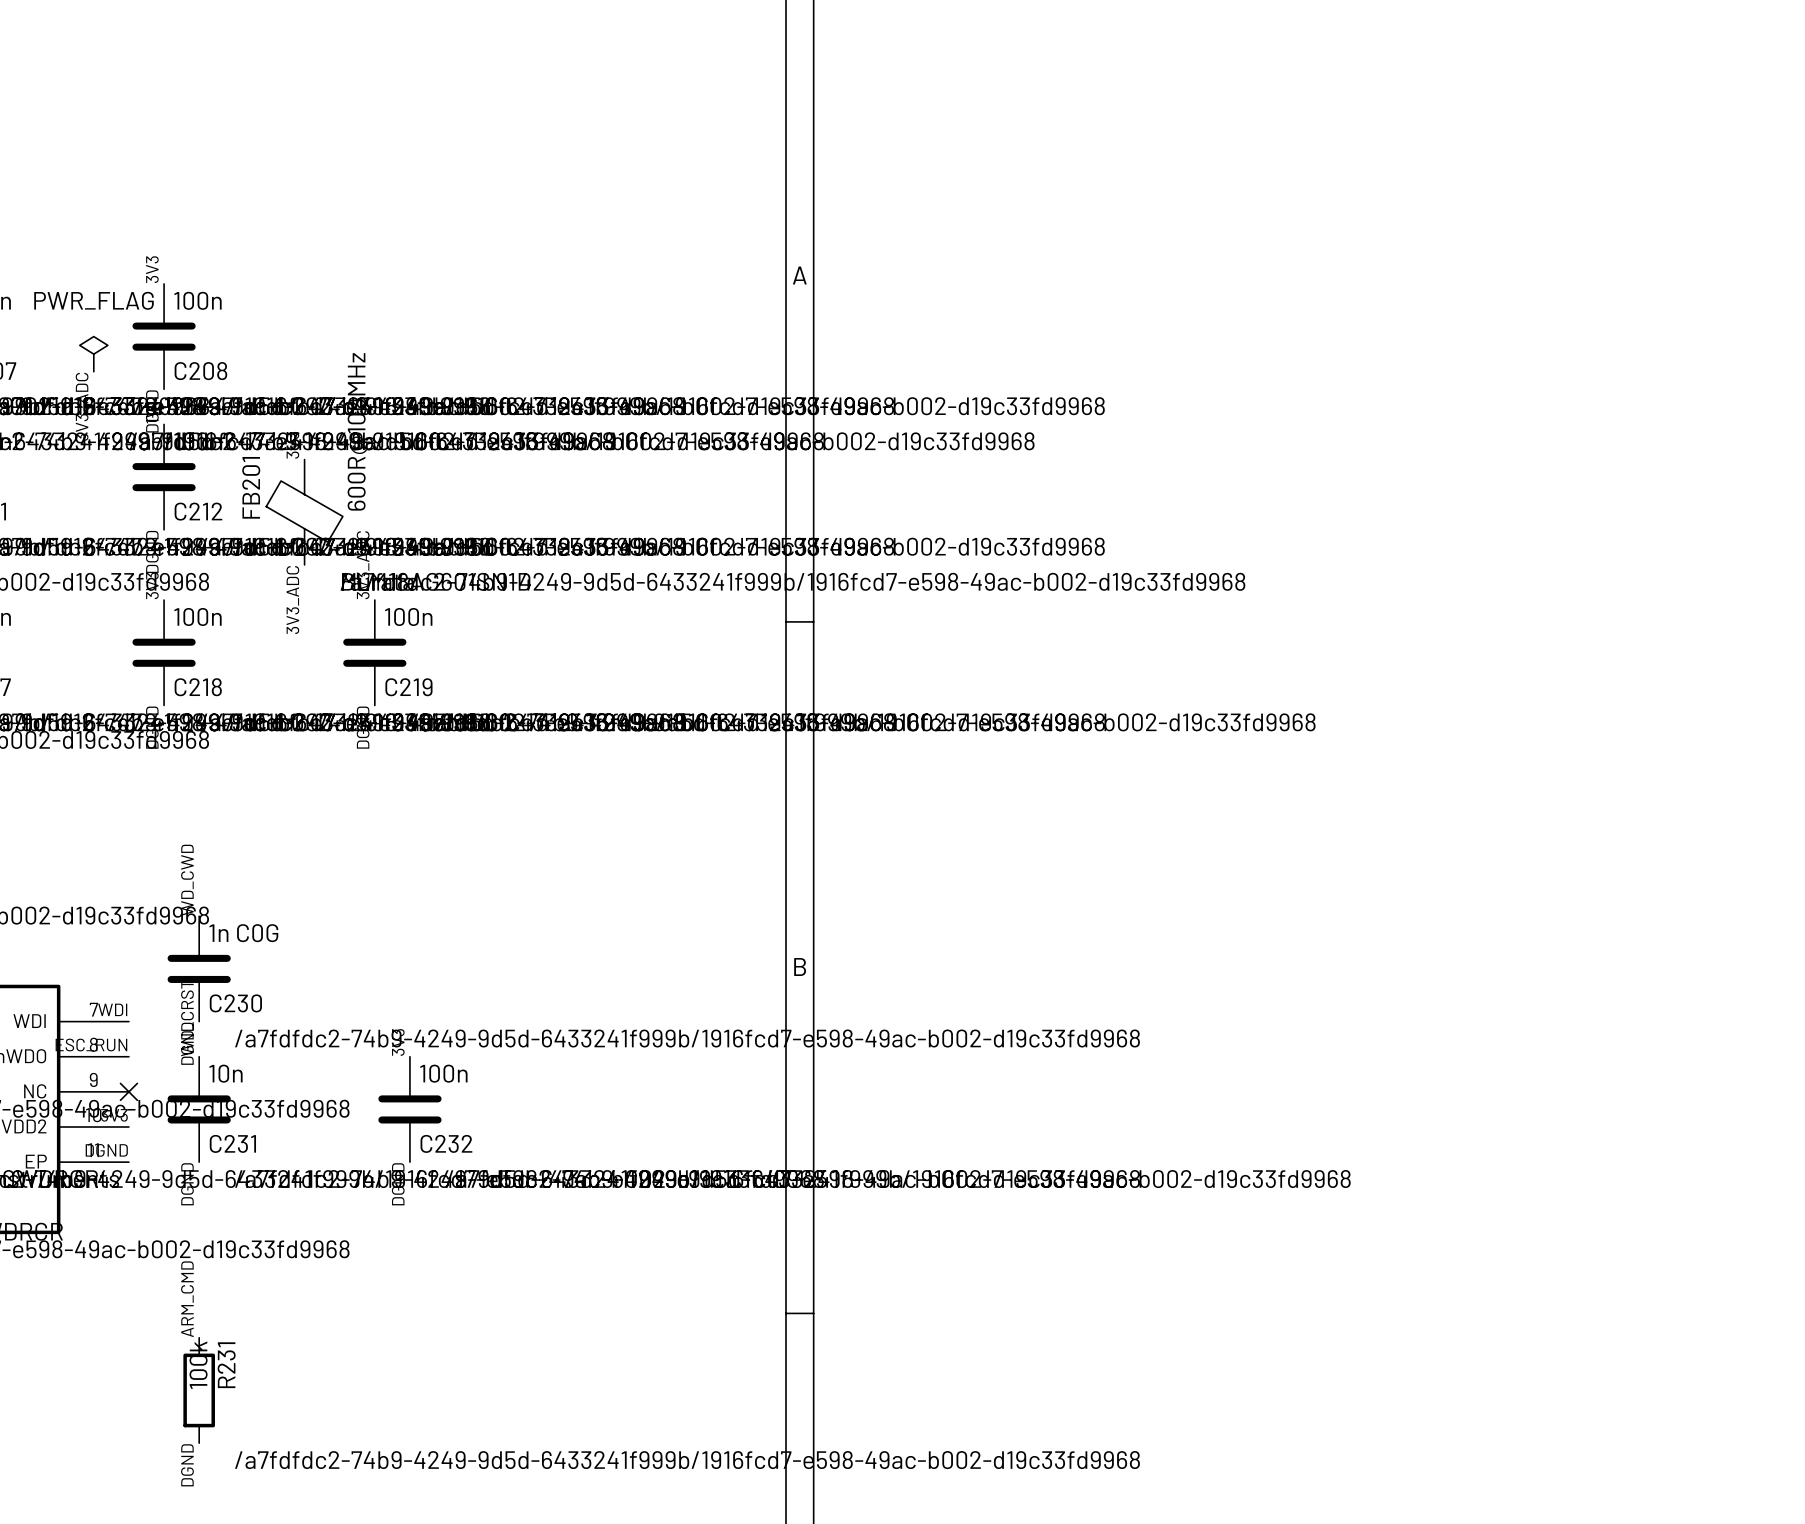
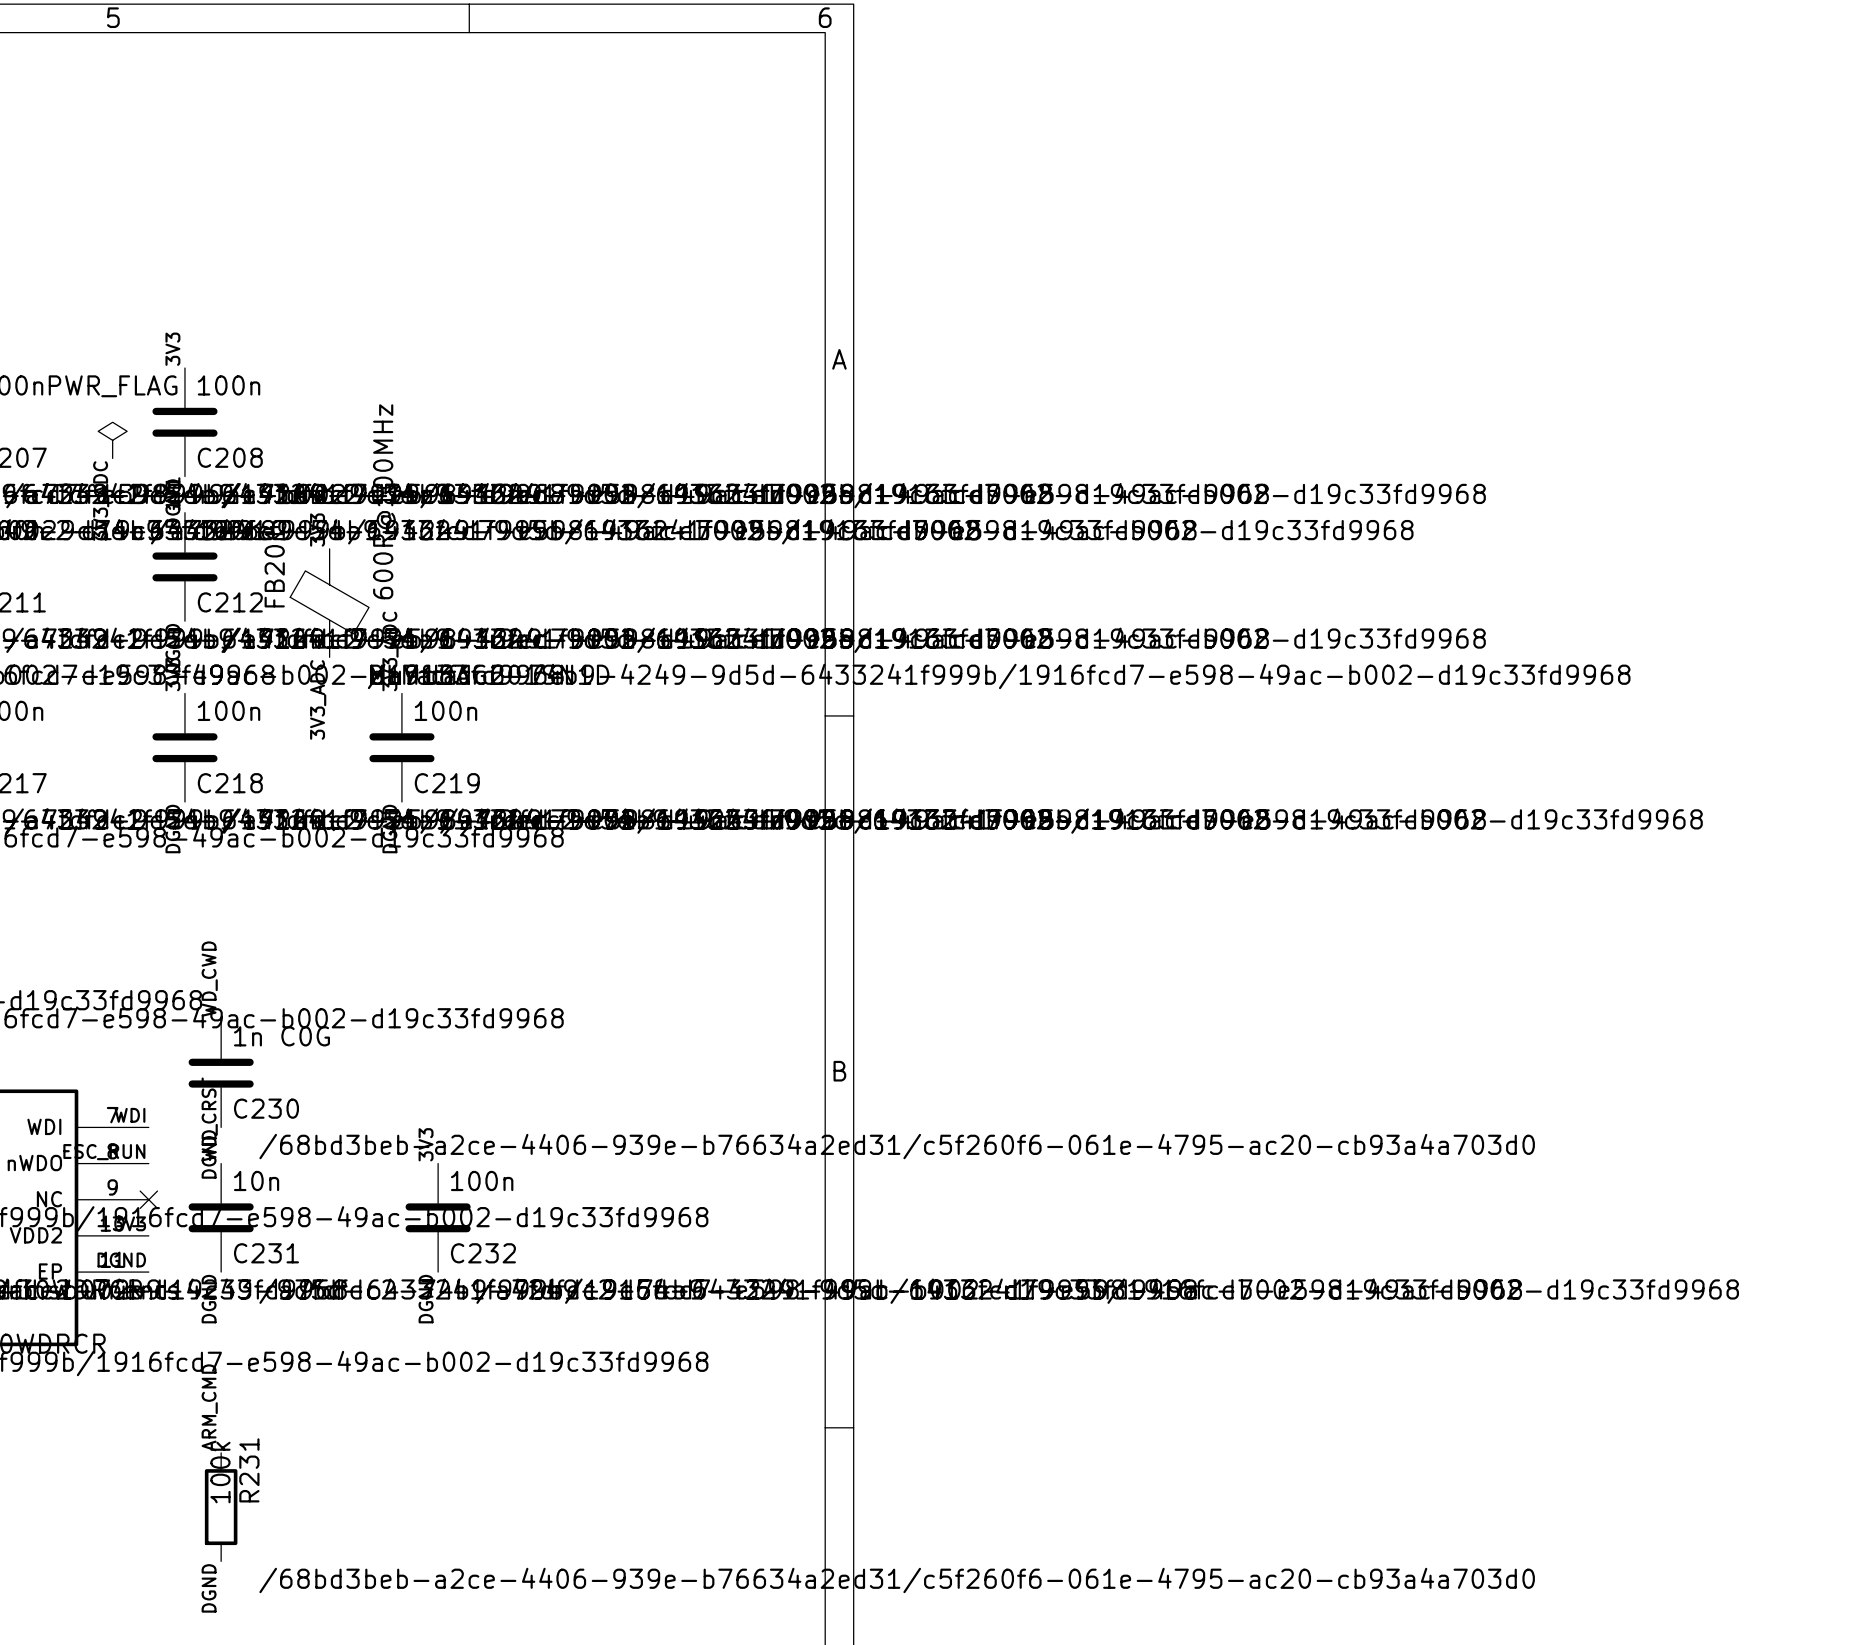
C230 text: /a7fdfdc2-74b9-4249-9d5d-6433241f999b/1916fcd7-e598-49ac-b002-d19c33fd9968 (687, 1038) -> /68bd3beb-a2ce-4406-939e-b76634a2ed31/c5f260f6-061e-4795-ac20-cb93a4a703d0 (897, 1146)
R231 text: /a7fdfdc2-74b9-4249-9d5d-6433241f999b/1916fcd7-e598-49ac-b002-d19c33fd9968 (687, 1460) -> /68bd3beb-a2ce-4406-939e-b76634a2ed31/c5f260f6-061e-4795-ac20-cb93a4a703d0 (897, 1580)

